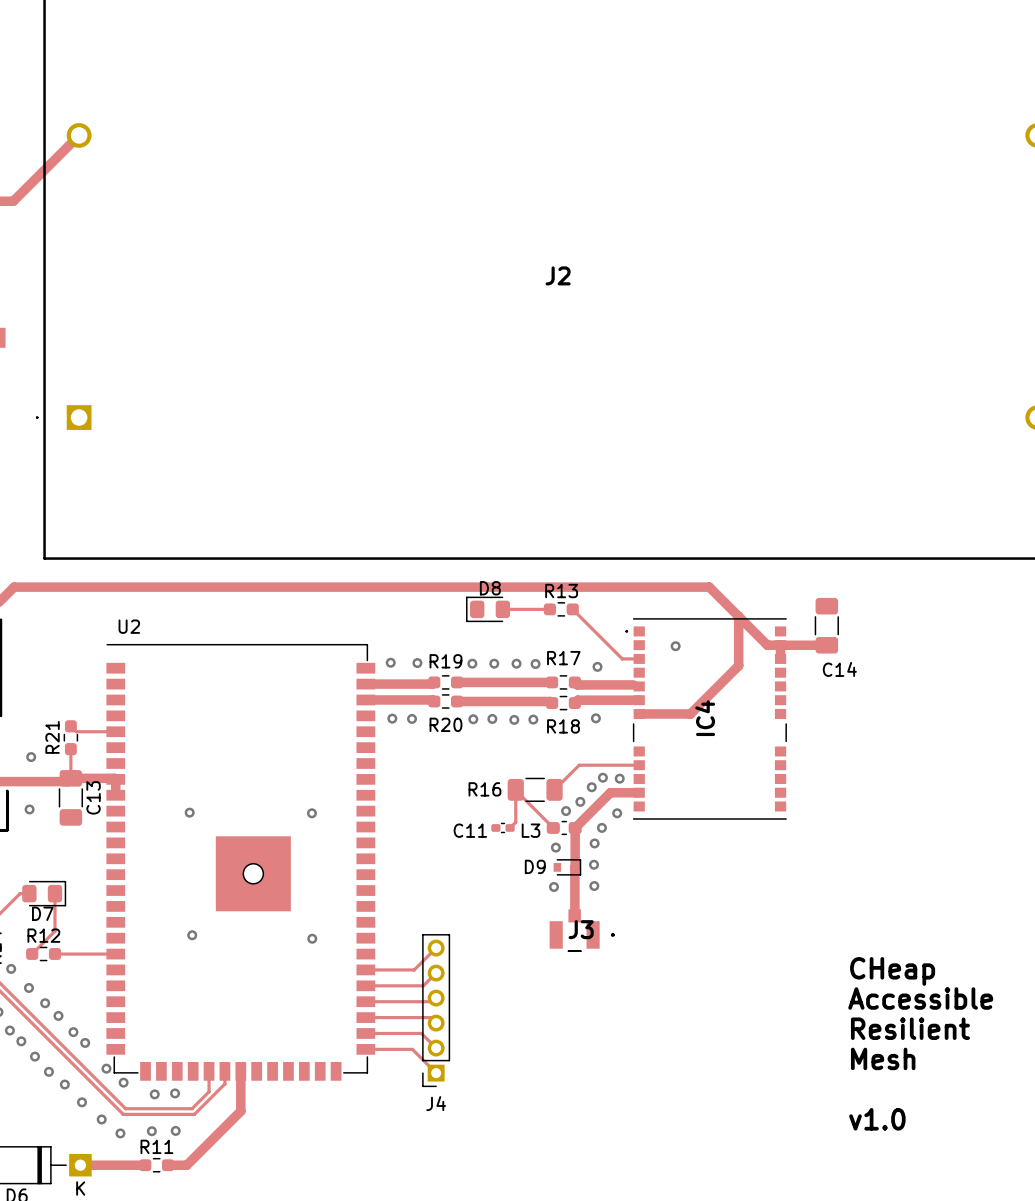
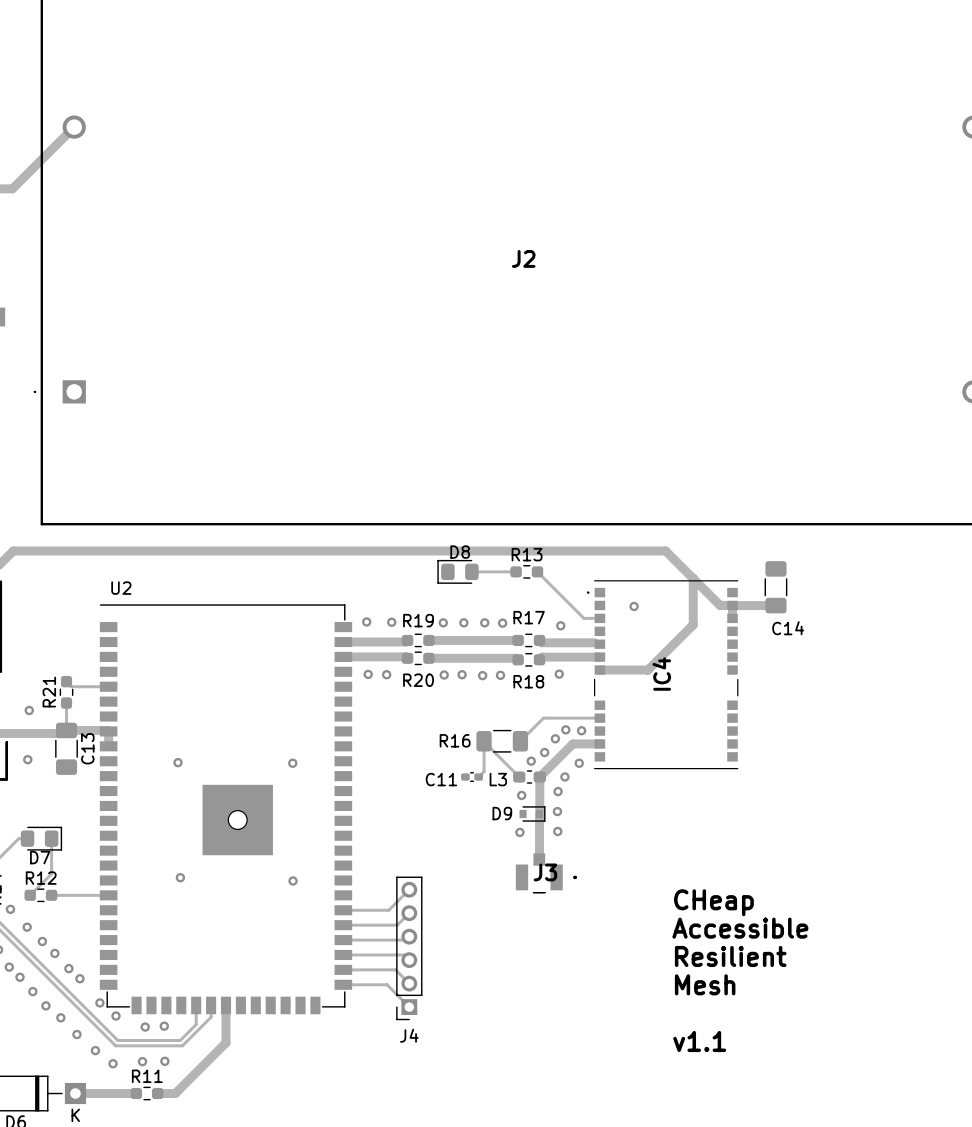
text position: CHeap (892, 971) -> CHeap (713, 902)
text position: Accessible (920, 998) -> Accessible (740, 928)
text position: Resilient (910, 1028) -> Resilient (730, 956)
text position: Mesh (883, 1058) -> Mesh (705, 984)
text: none -> v1.1 (699, 1041)
text: v1.0 (877, 1119) -> none

